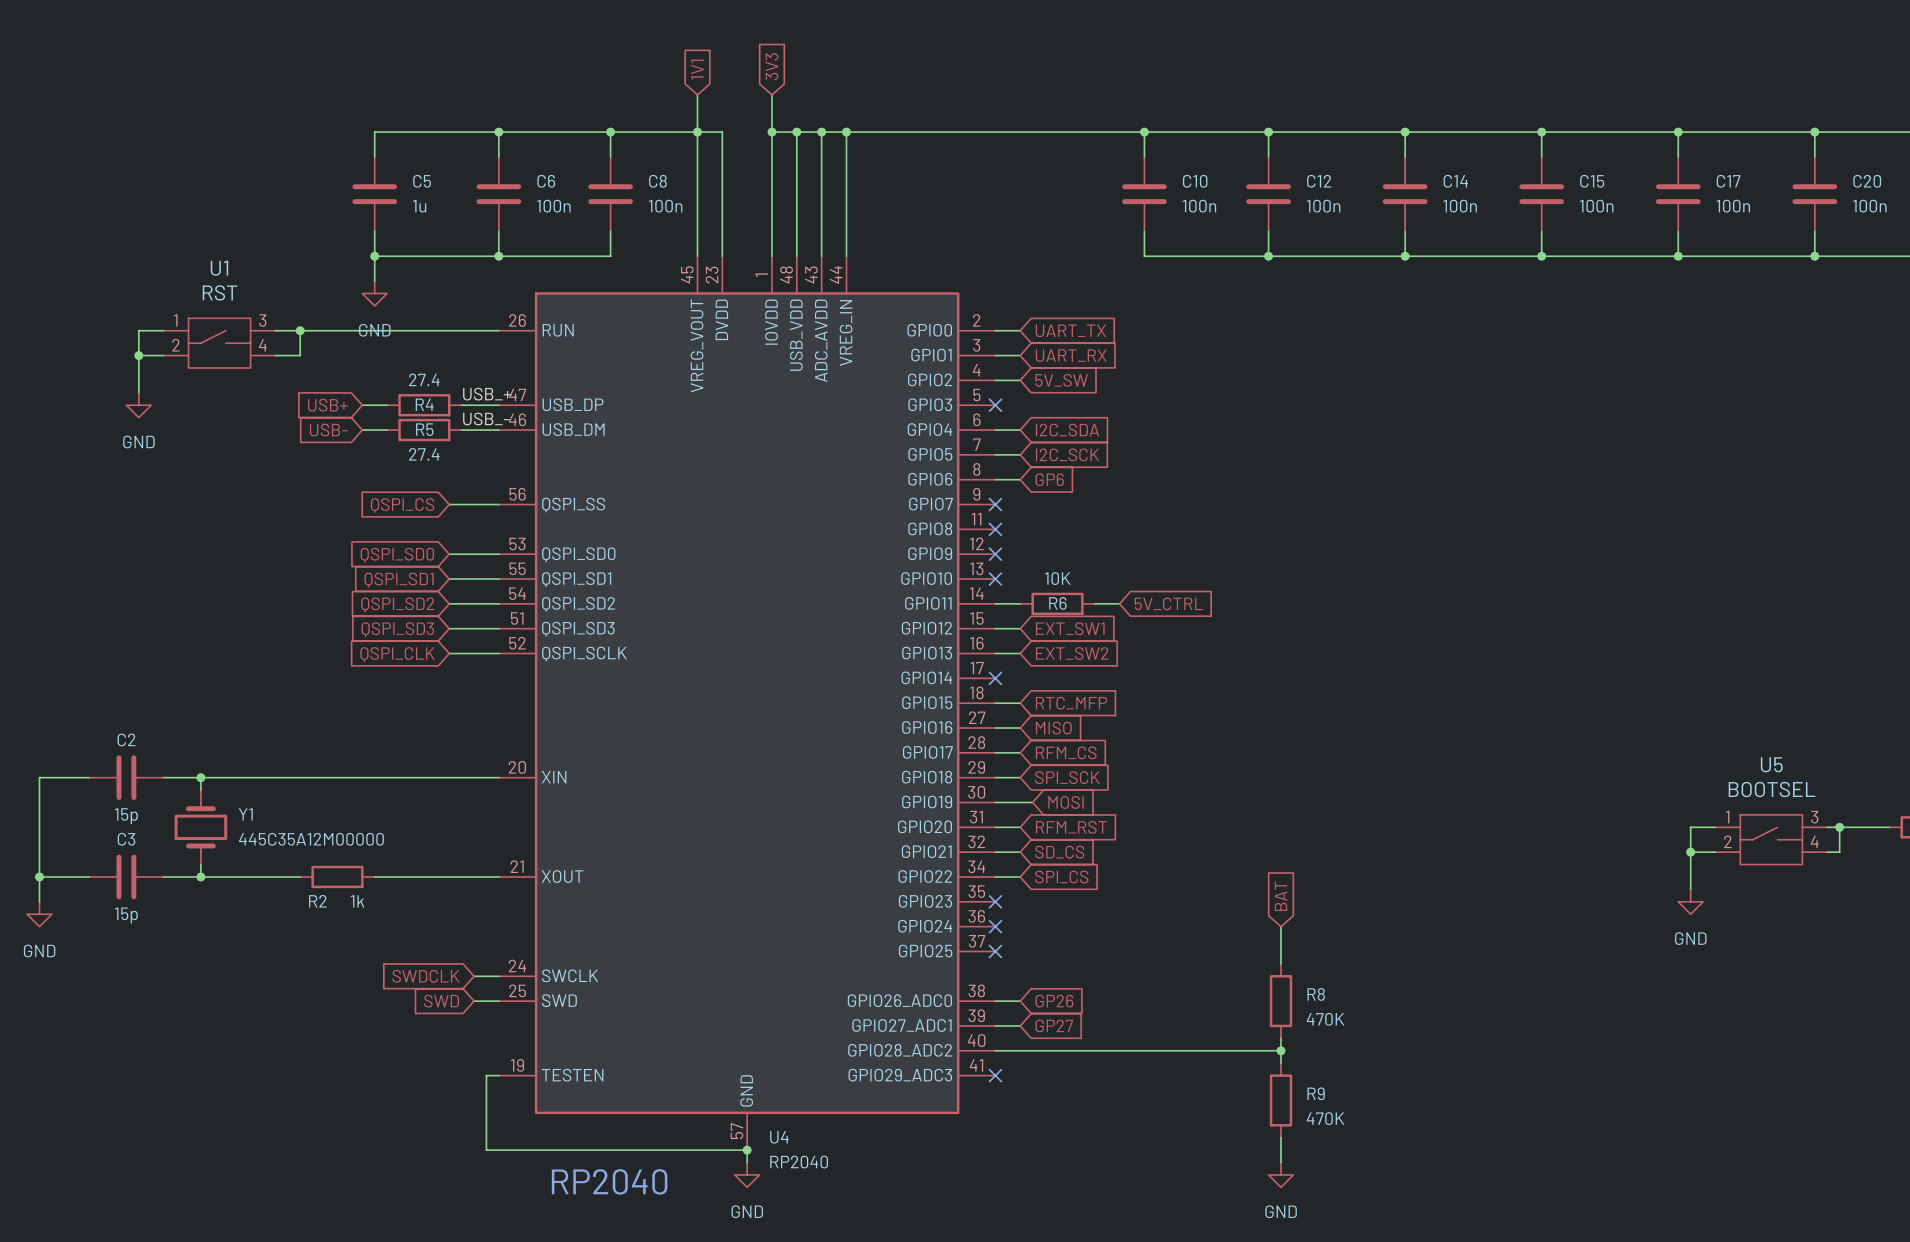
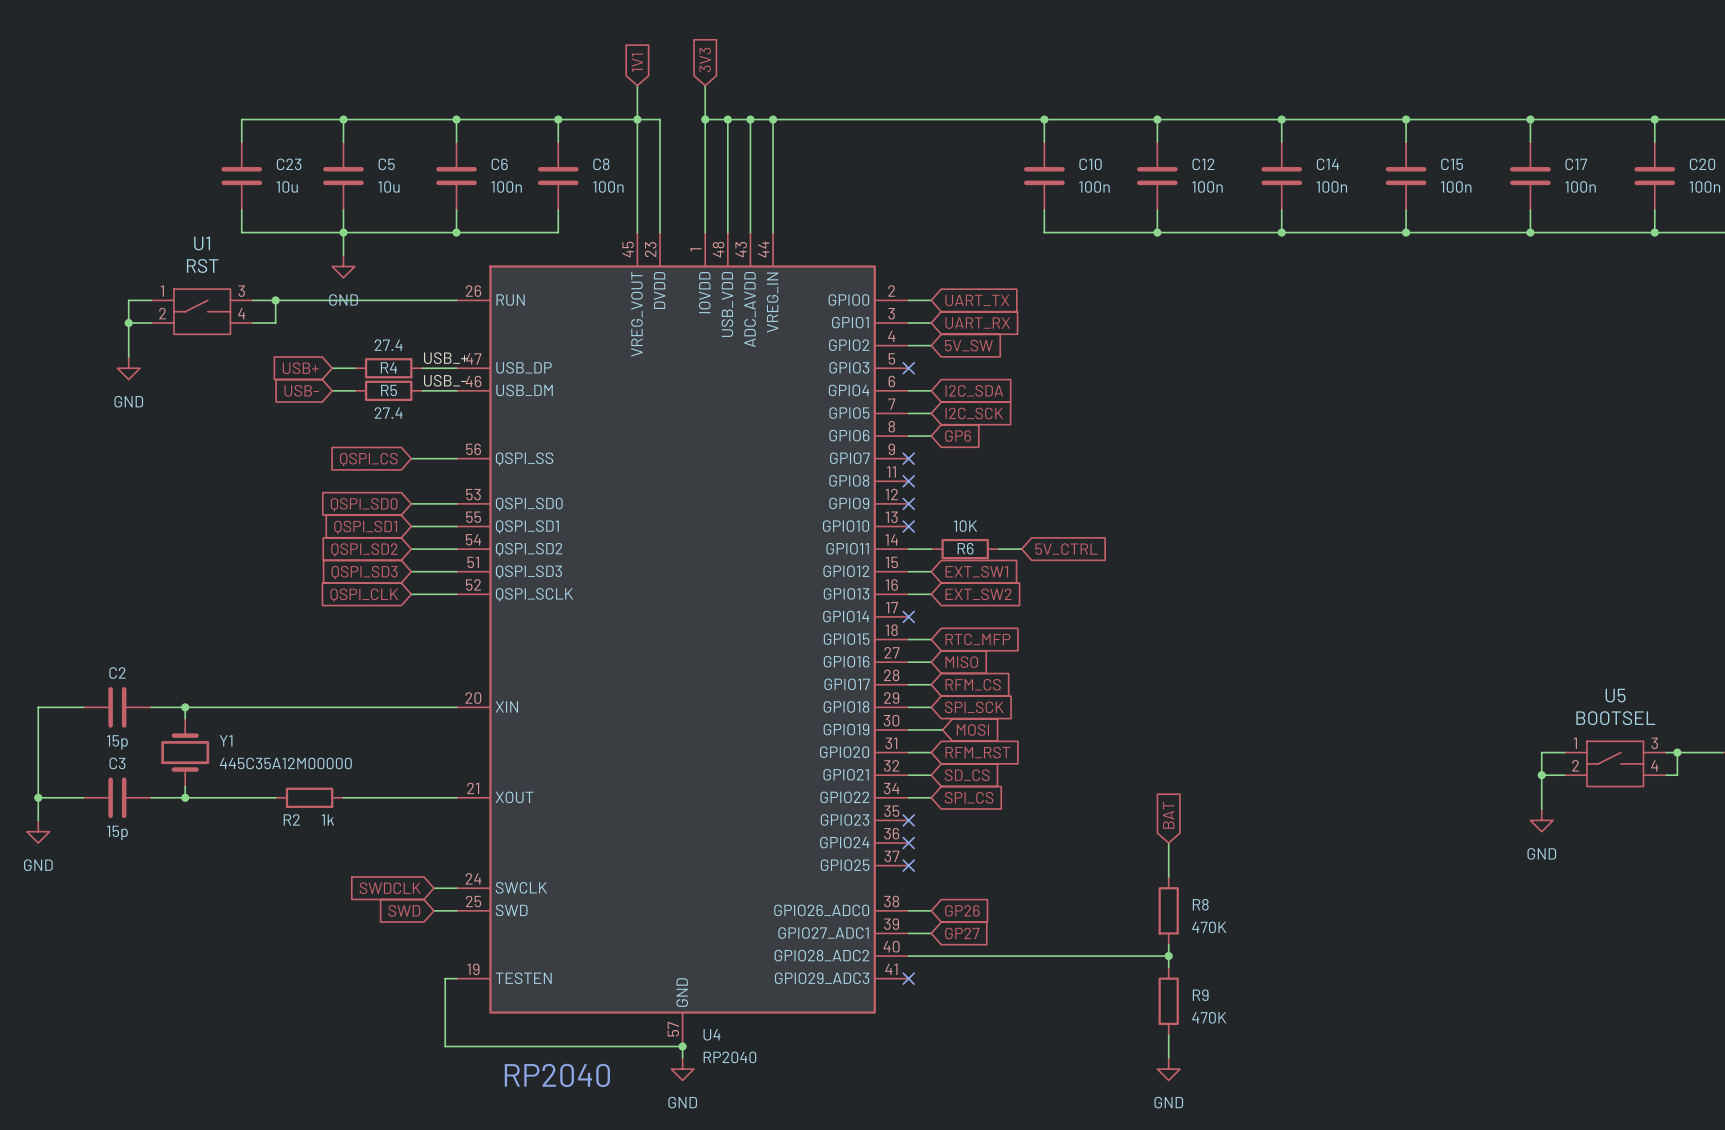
wire: none -> (343, 119) (241, 119) (241, 142)
junction: none -> (343, 119)
C23: none -> 10u (241, 176)
C5 value: 1u (419, 206) -> 10u (388, 186)
wire: none -> (241, 209) (241, 232) (343, 232)

